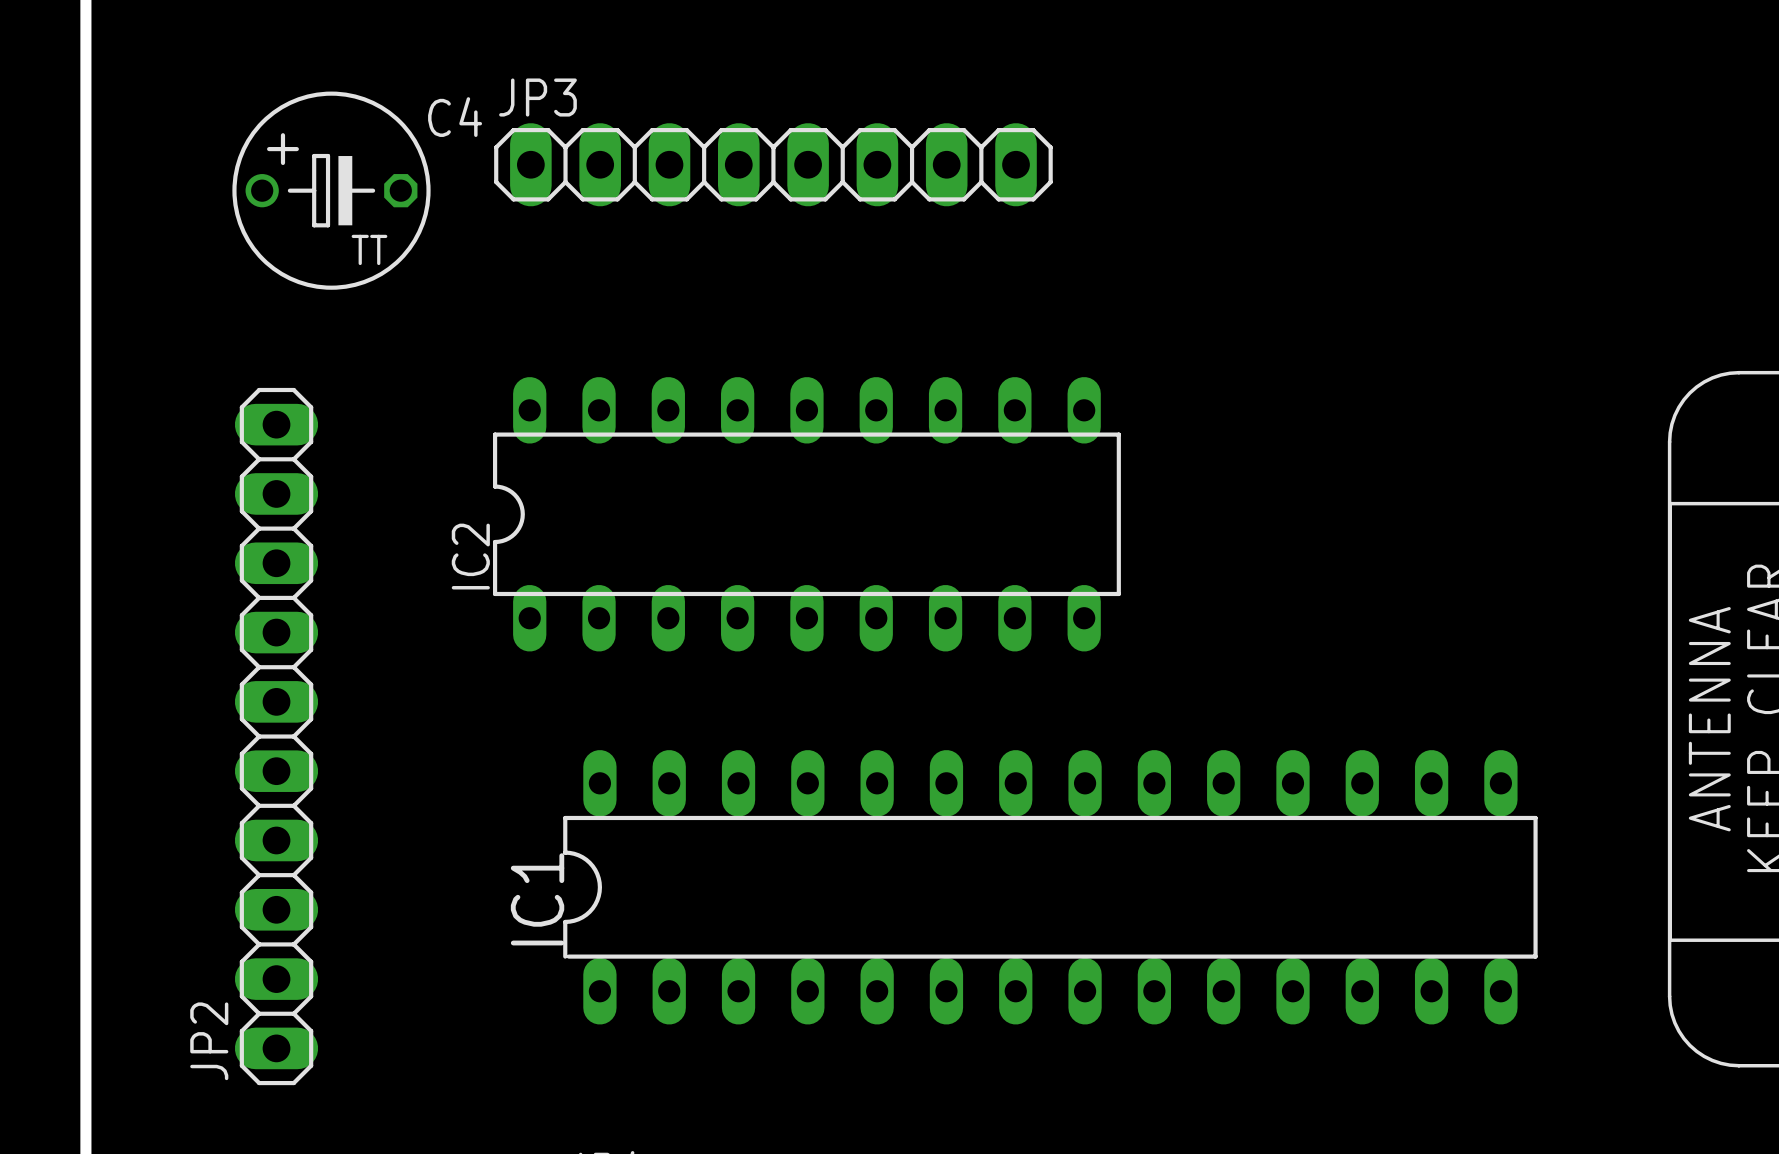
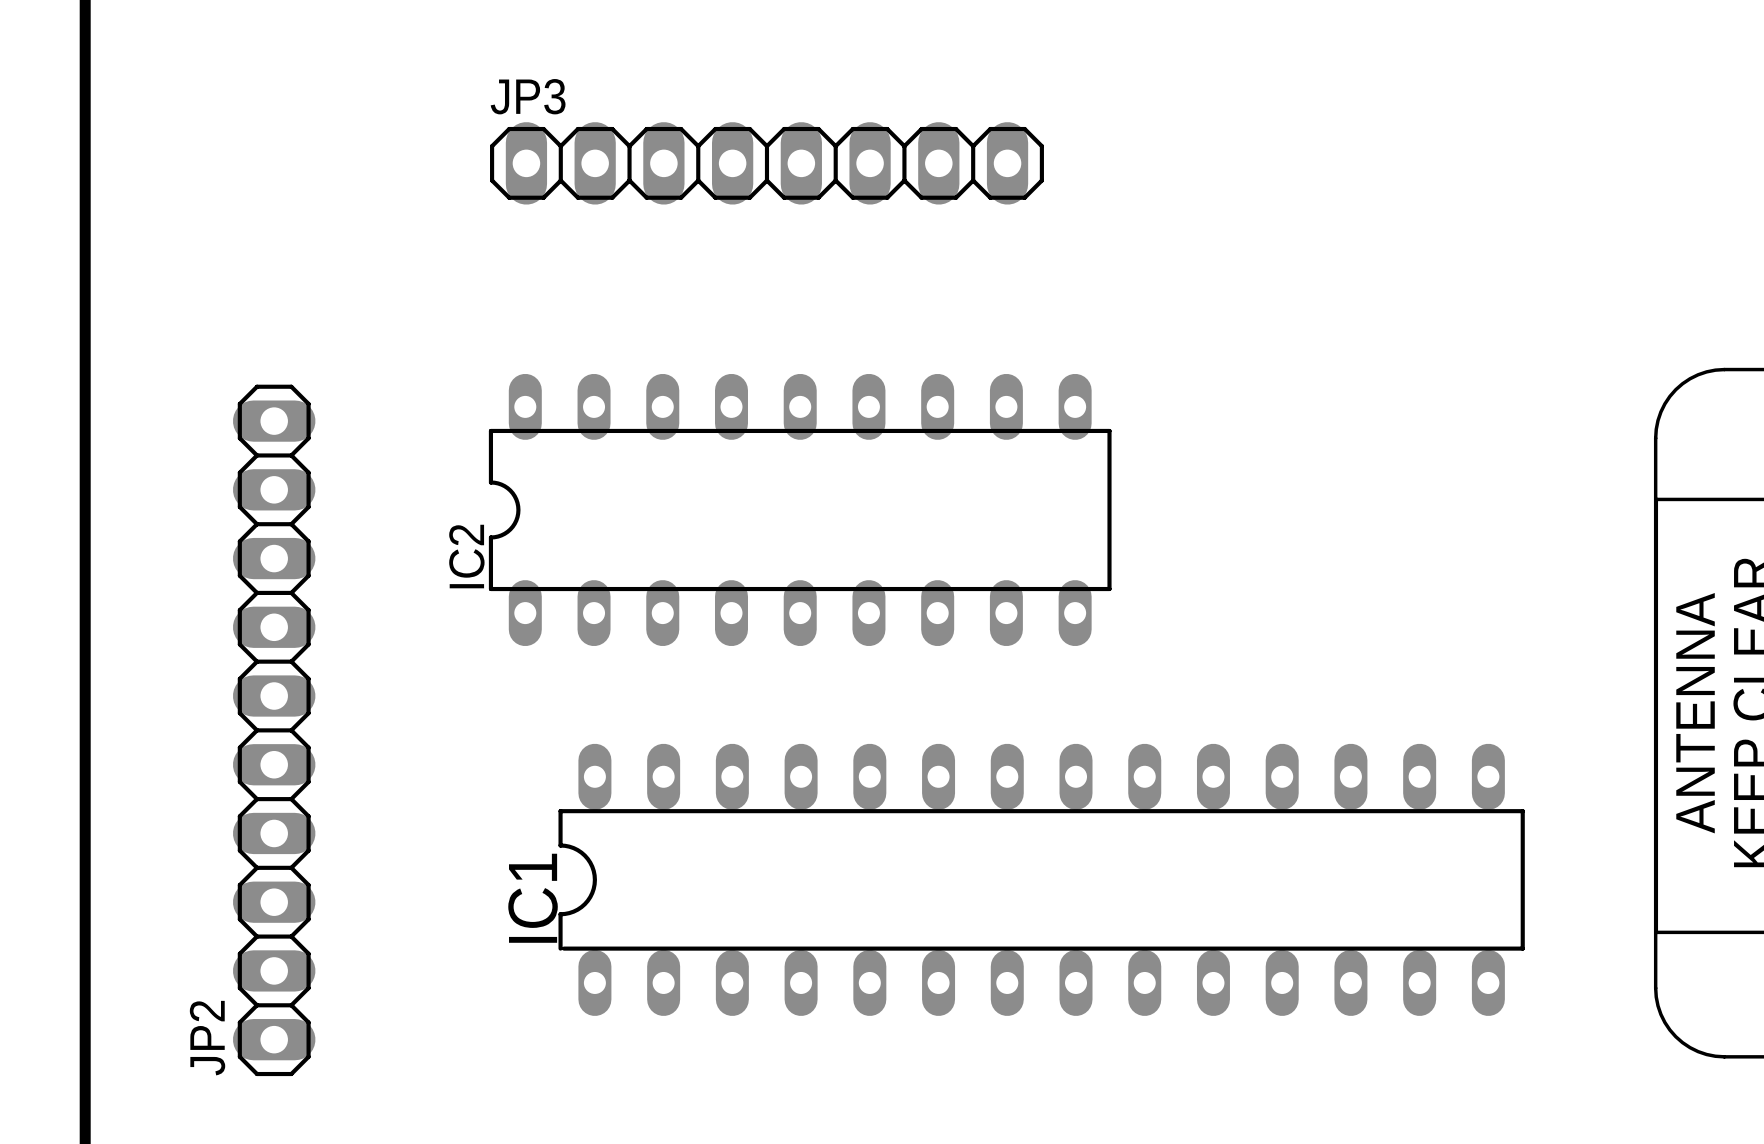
C4: (331, 190) -> none

